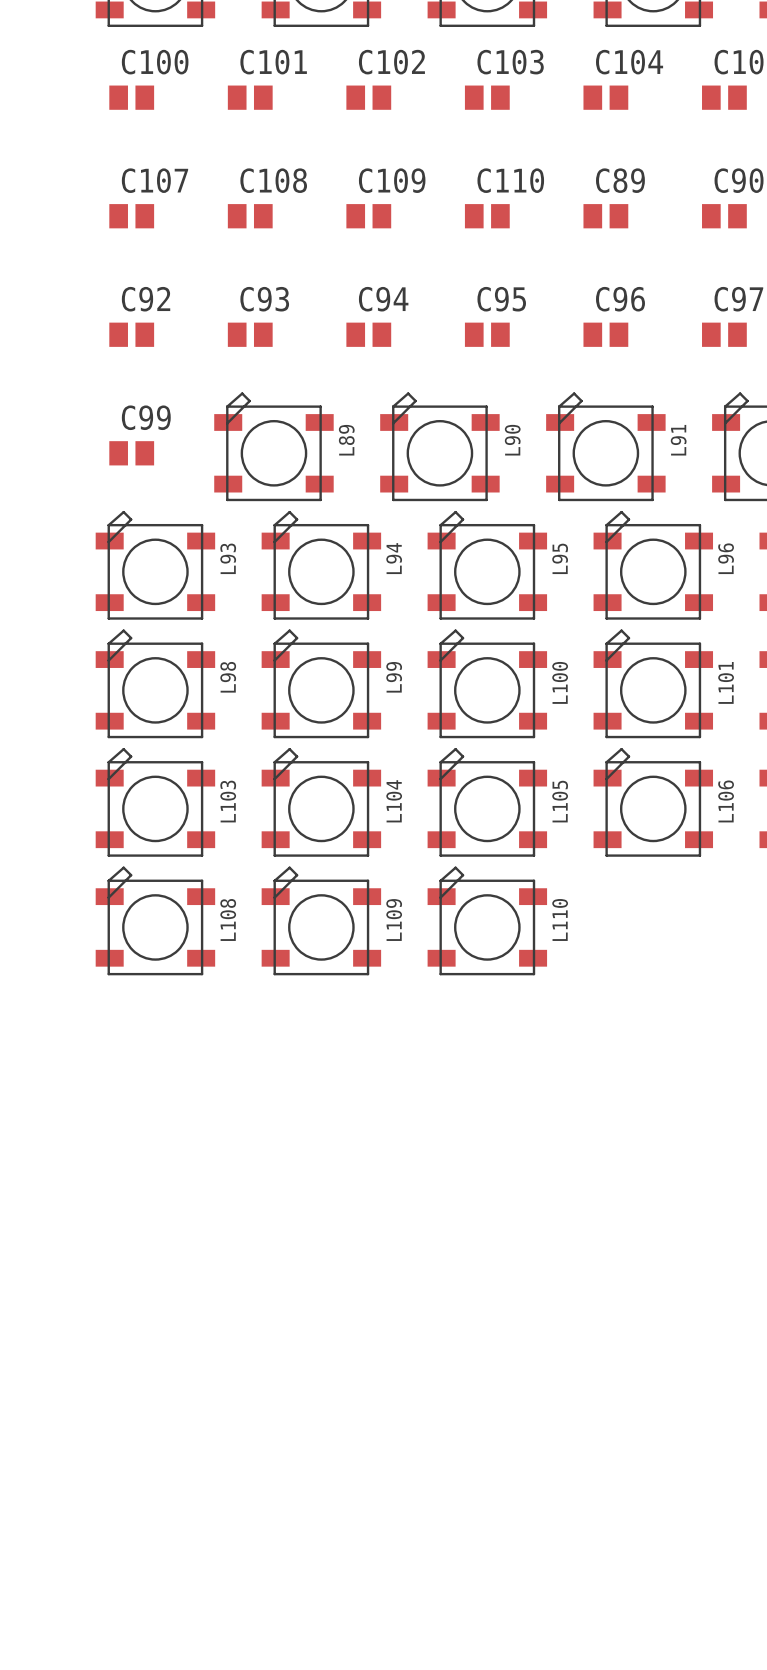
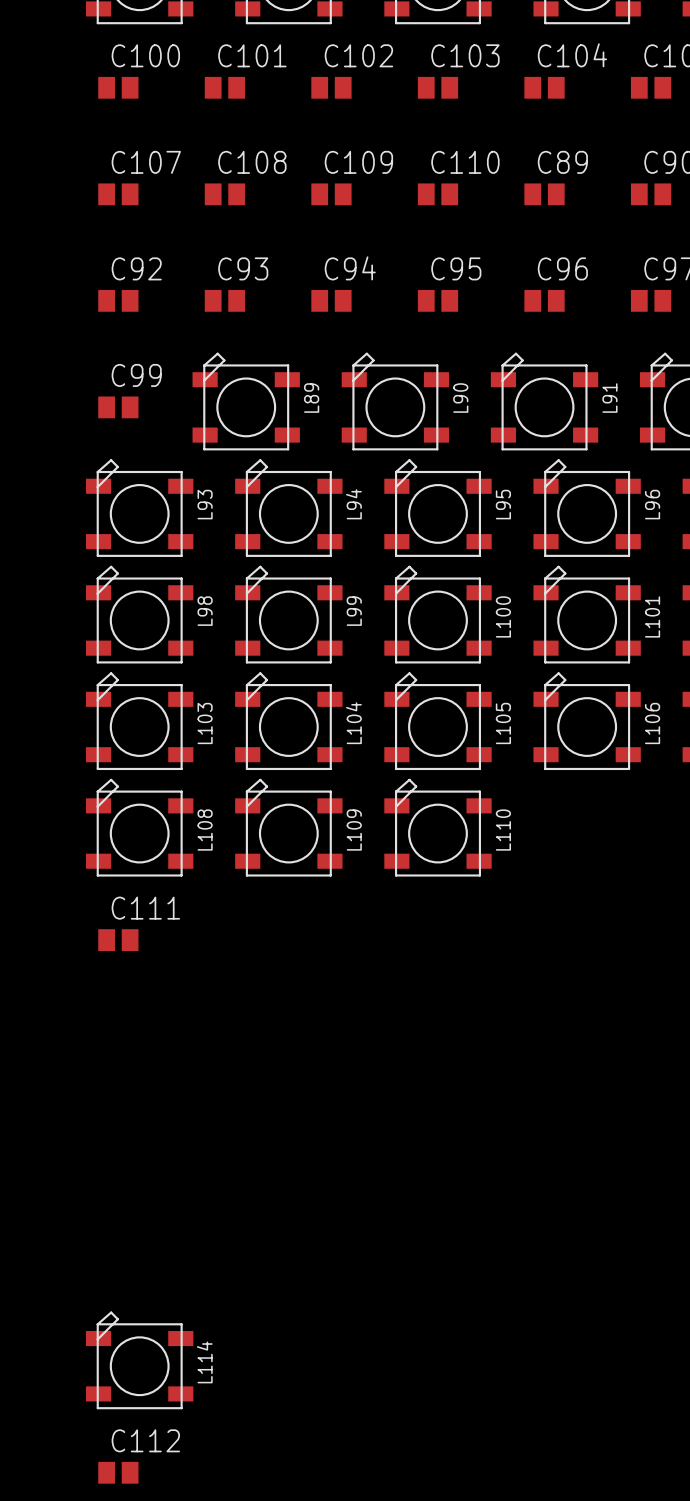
C111: none -> (118, 940)
L114: none -> (139, 1360)
C112: none -> (118, 1472)

